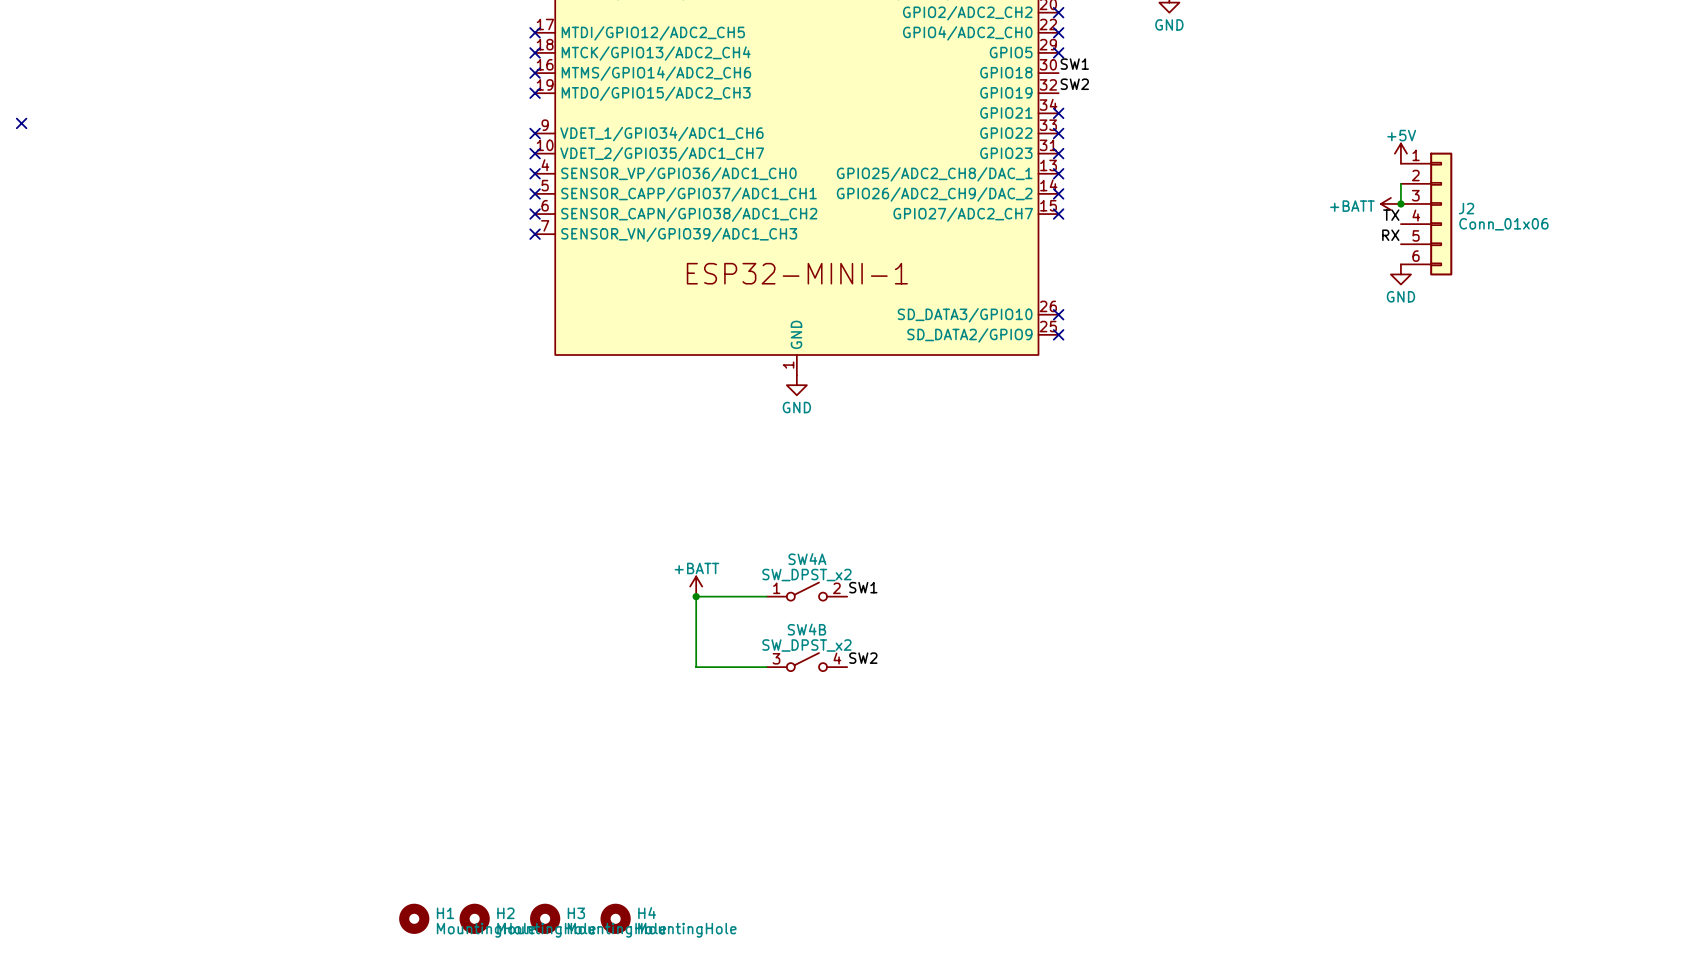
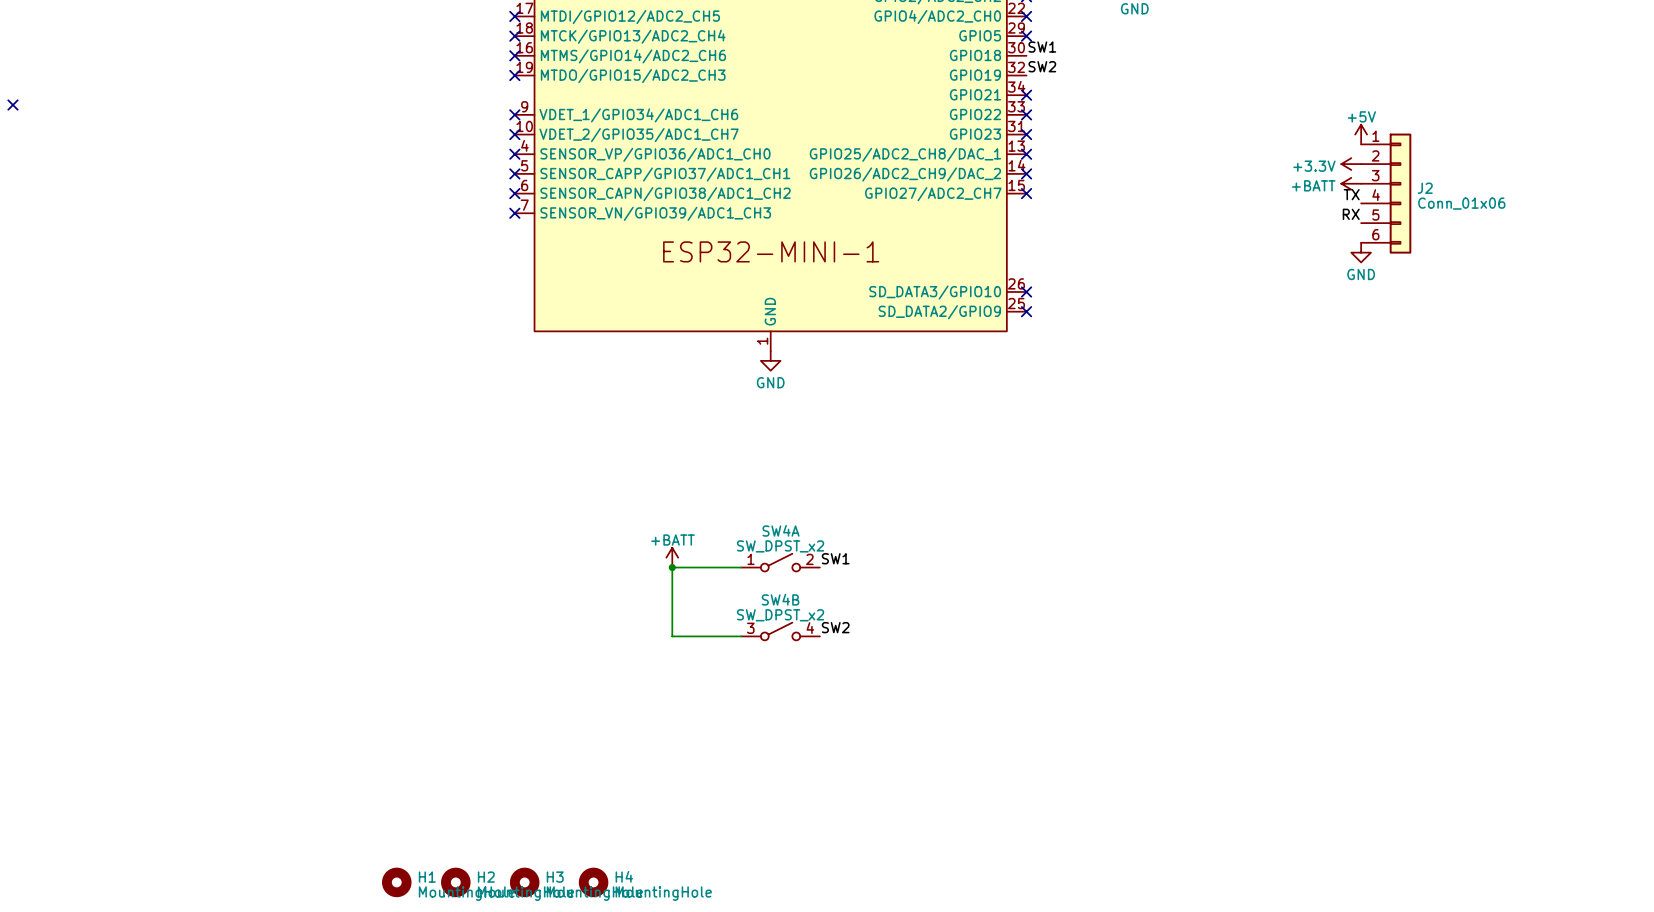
power symbol: none -> +3.3V (1351, 164)
wire: (1400, 183) (1400, 203) -> none
junction: (1400, 203) -> none

